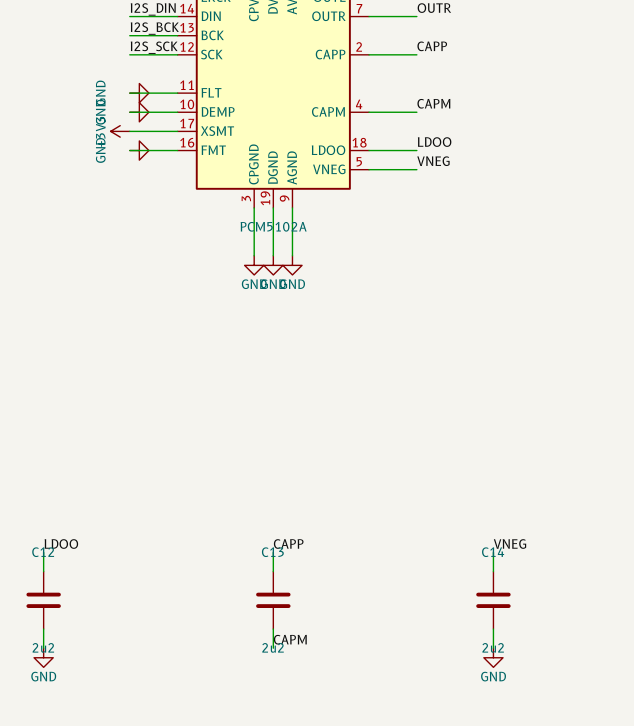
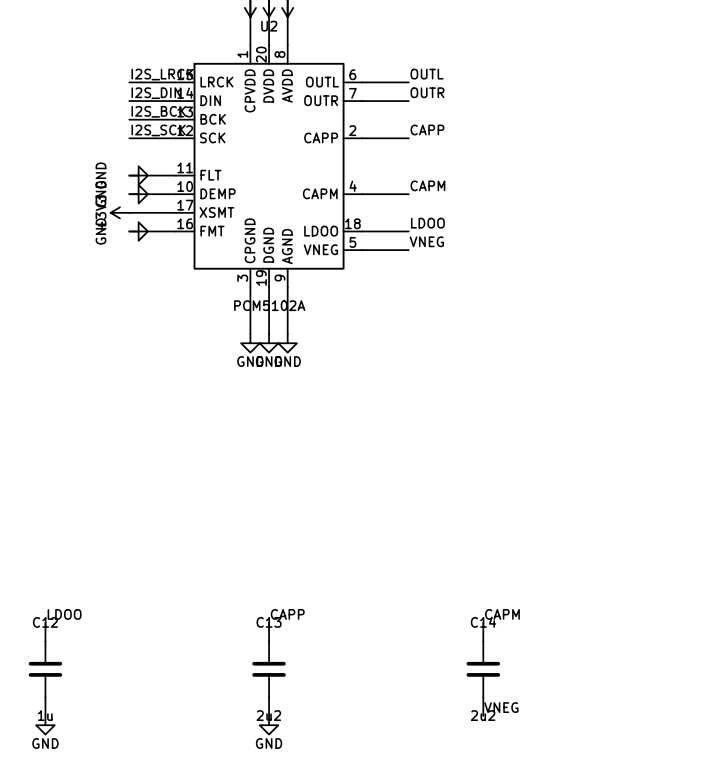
label: VNEG (510, 544) -> CAPM (502, 614)
label: CAPM (290, 639) -> none
label: none -> VNEG (501, 707)
C12 value: 2u2 (43, 647) -> 1u (45, 715)
power symbol: none -> GND (269, 725)
power symbol: GND (493, 657) -> none

